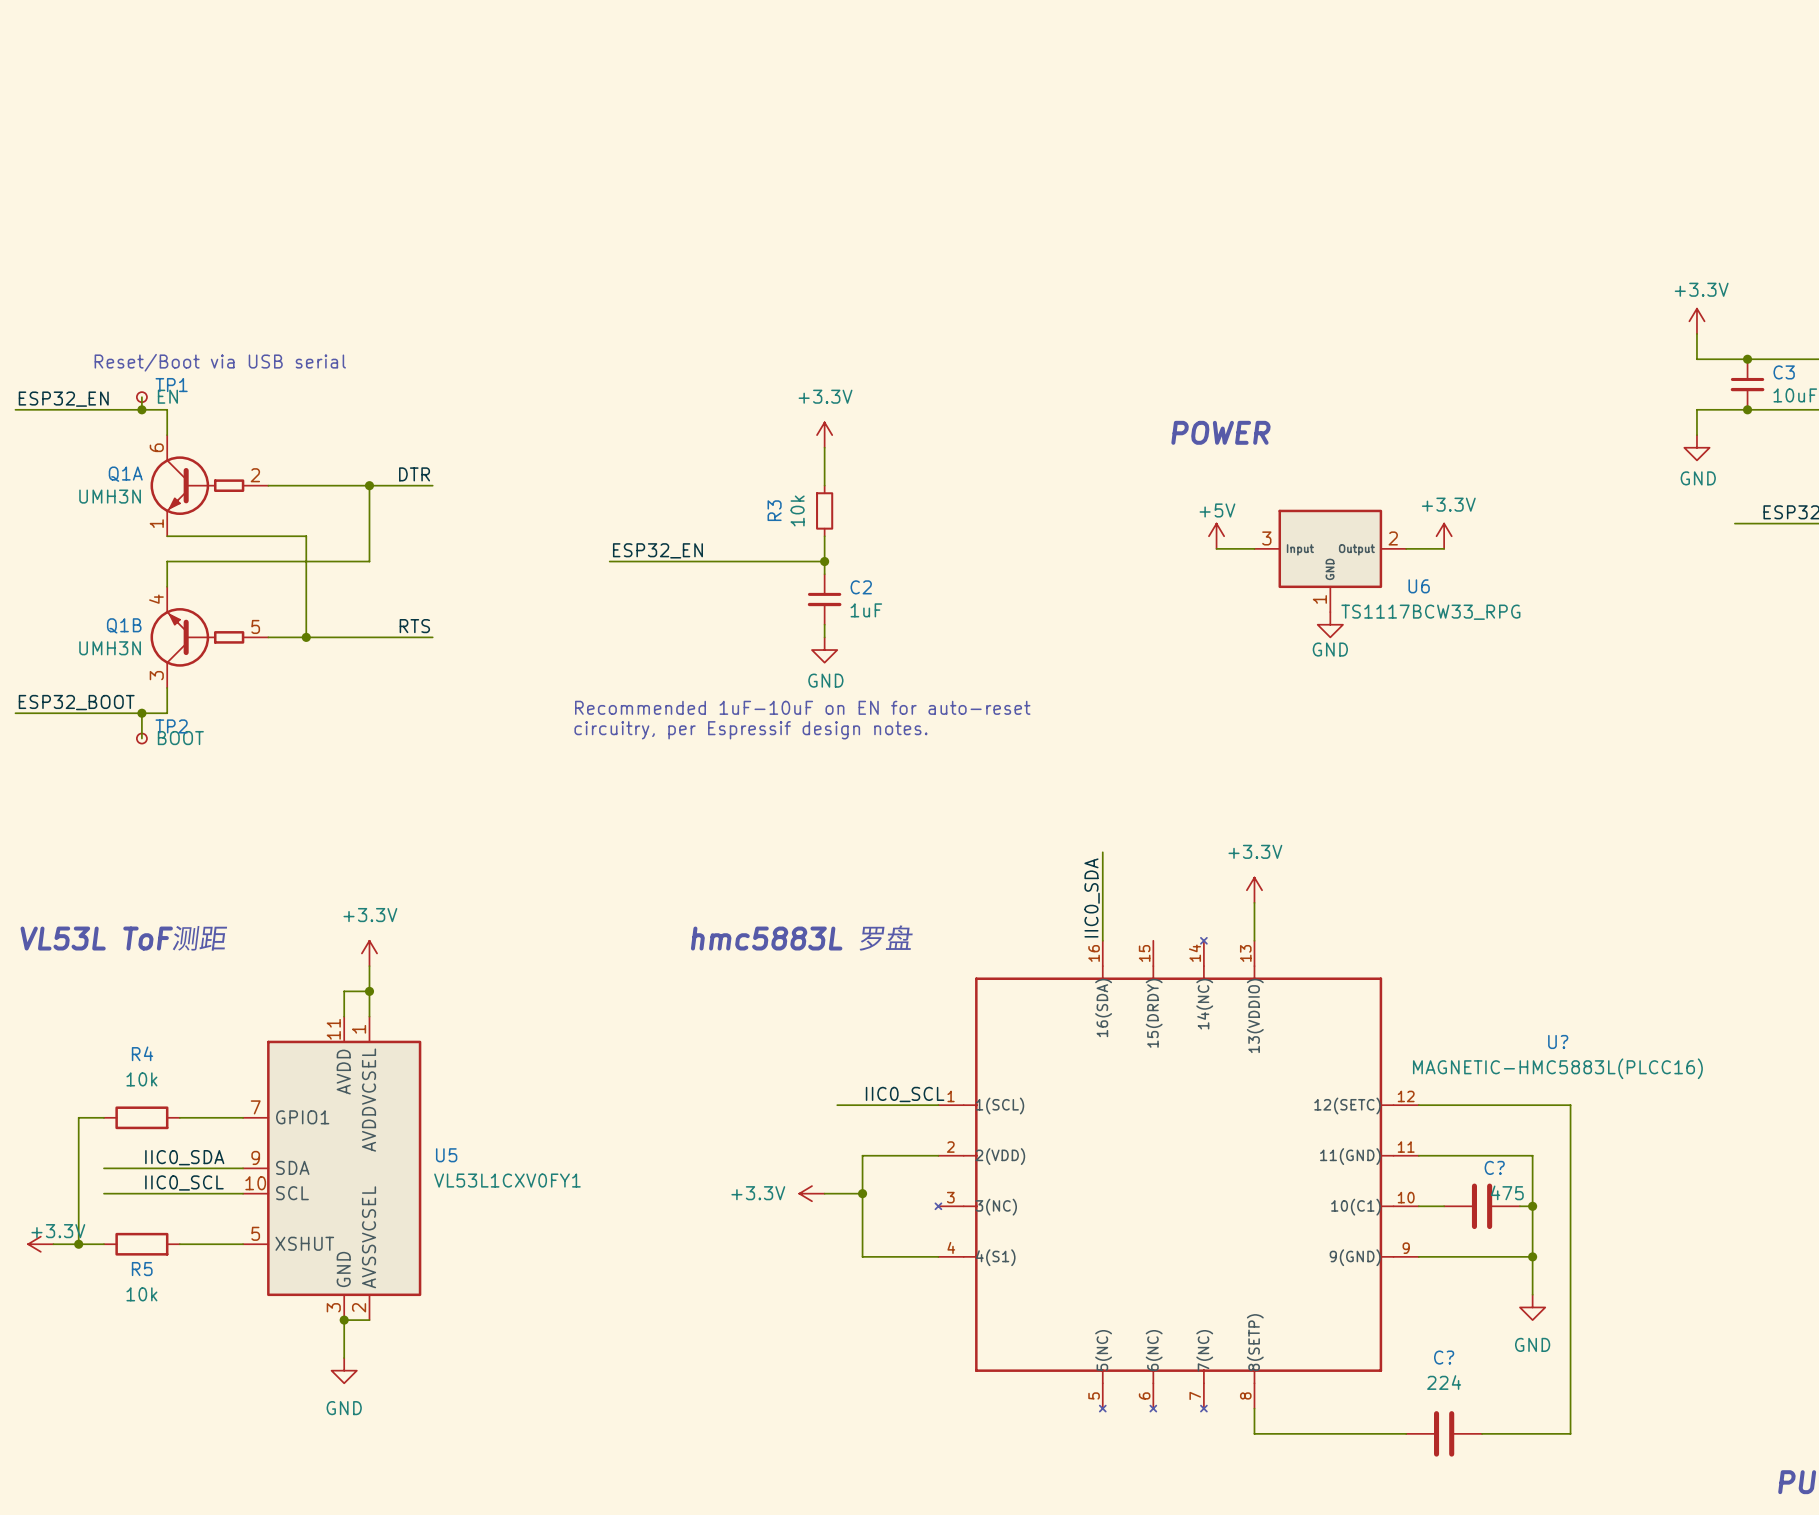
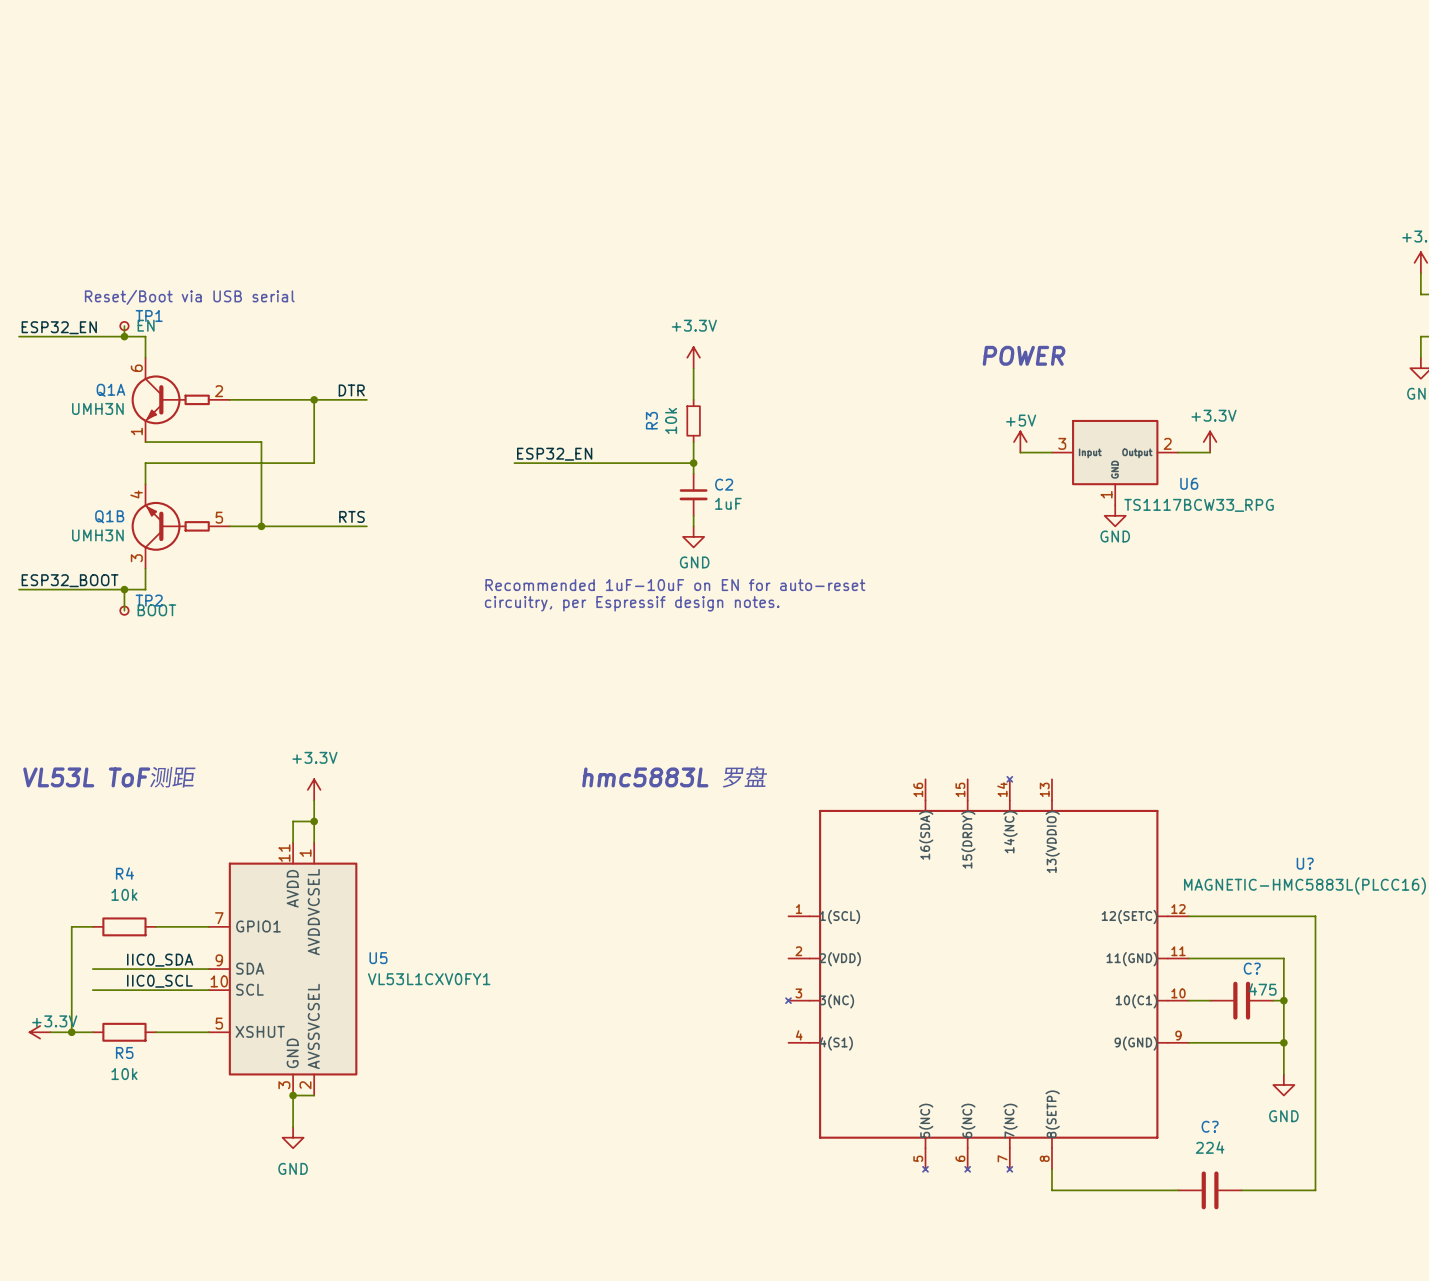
wire: (1102, 852) (1102, 940) -> none
power symbol: +3.3V (1254, 890) -> none
label: IIC0_SDA (1092, 897) -> none
wire: (1254, 902) (1254, 940) -> none
label: IIC0_SCL (905, 1094) -> none
wire: (837, 1105) (938, 1105) -> none
wire: (938, 1155) (862, 1155) (862, 1256) (938, 1256) -> none
power symbol: +3.3V (811, 1193) -> none
wire: (824, 1193) (862, 1193) -> none
junction: (862, 1193) -> none

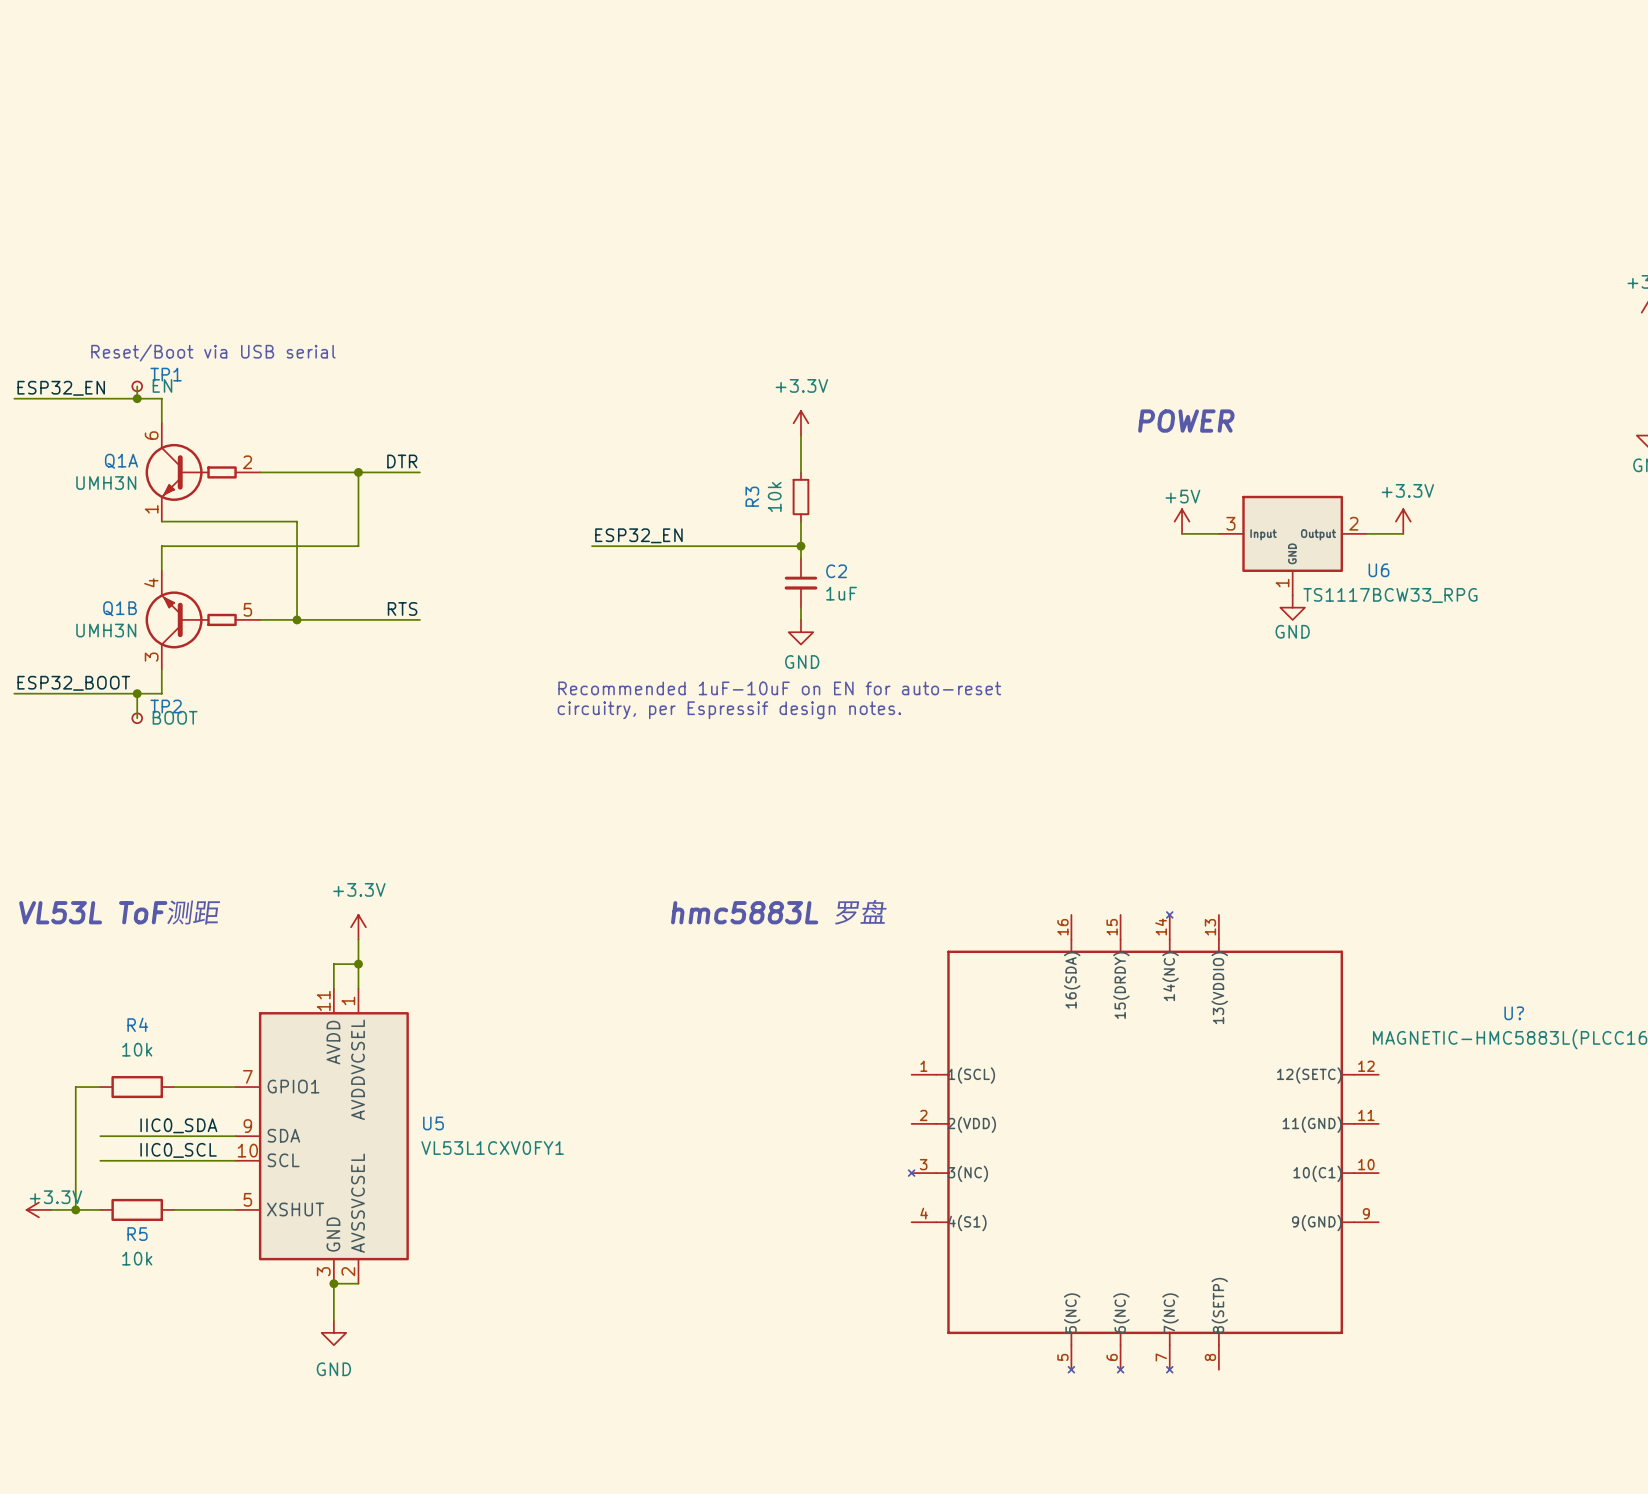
wire: (1189, 916) (1315, 916) (1315, 1190) (1241, 1190) -> none
wire: (1189, 958) (1283, 958) (1283, 1074) -> none
wire: (1189, 1000) (1210, 1000) -> none
C?: 475 (1241, 1000) -> none
wire: (1273, 1000) (1283, 1000) -> none
junction: (1283, 1000) -> none
wire: (1189, 1042) (1283, 1042) -> none
junction: (1283, 1042) -> none
power symbol: GND (1283, 1084) -> none
wire: (1051, 1169) (1051, 1190) (1178, 1190) -> none
C?: 224 (1210, 1190) -> none

